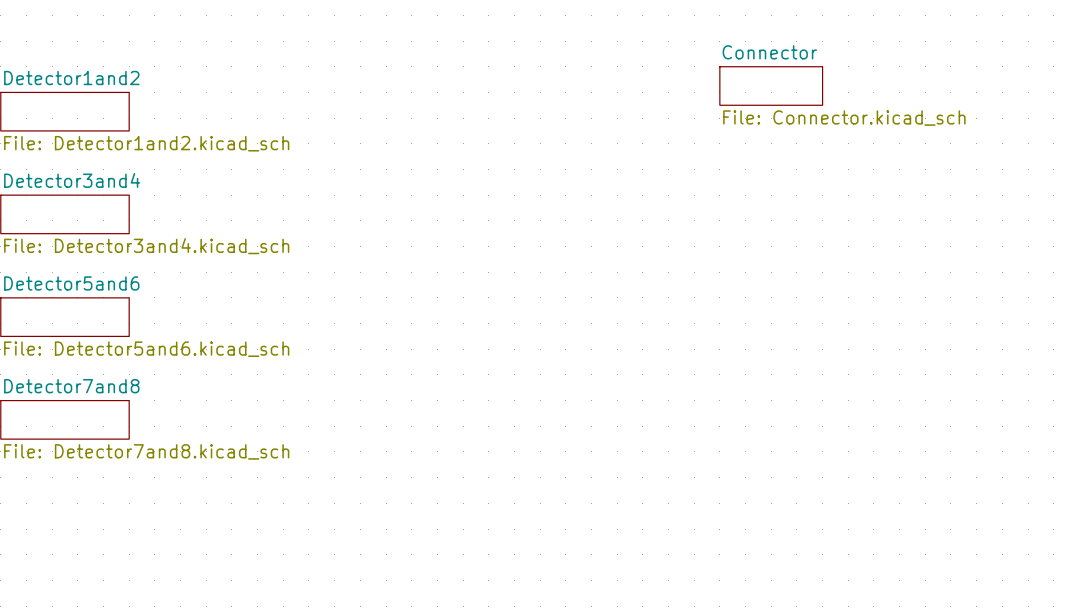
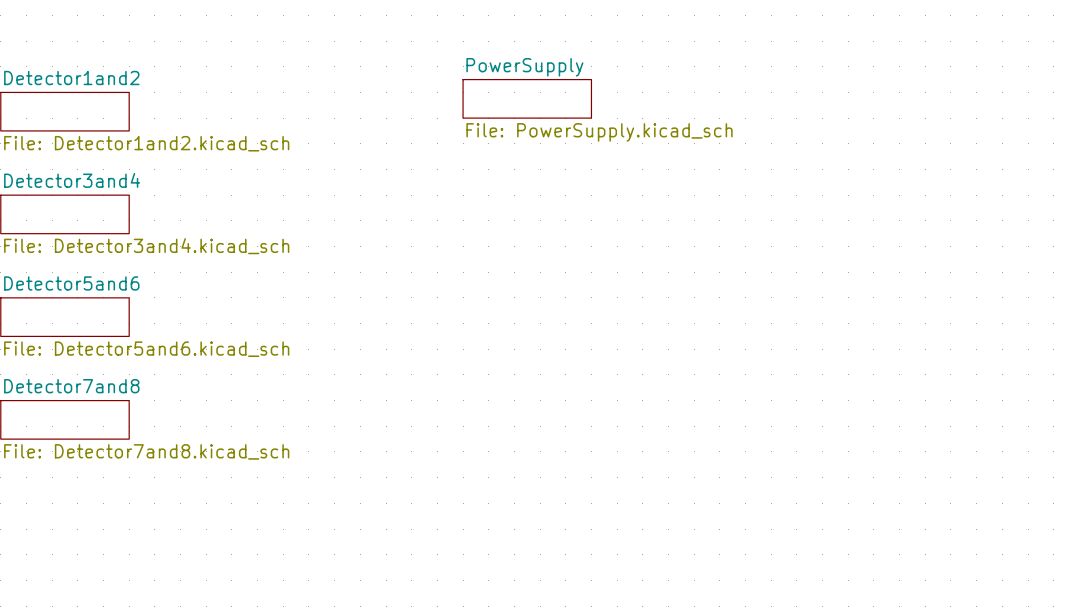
sheet Connector: File: Connector.kicad_sch (771, 86) -> none
sheet PowerSupply: none -> File: PowerSupply.kicad_sch (527, 98)

